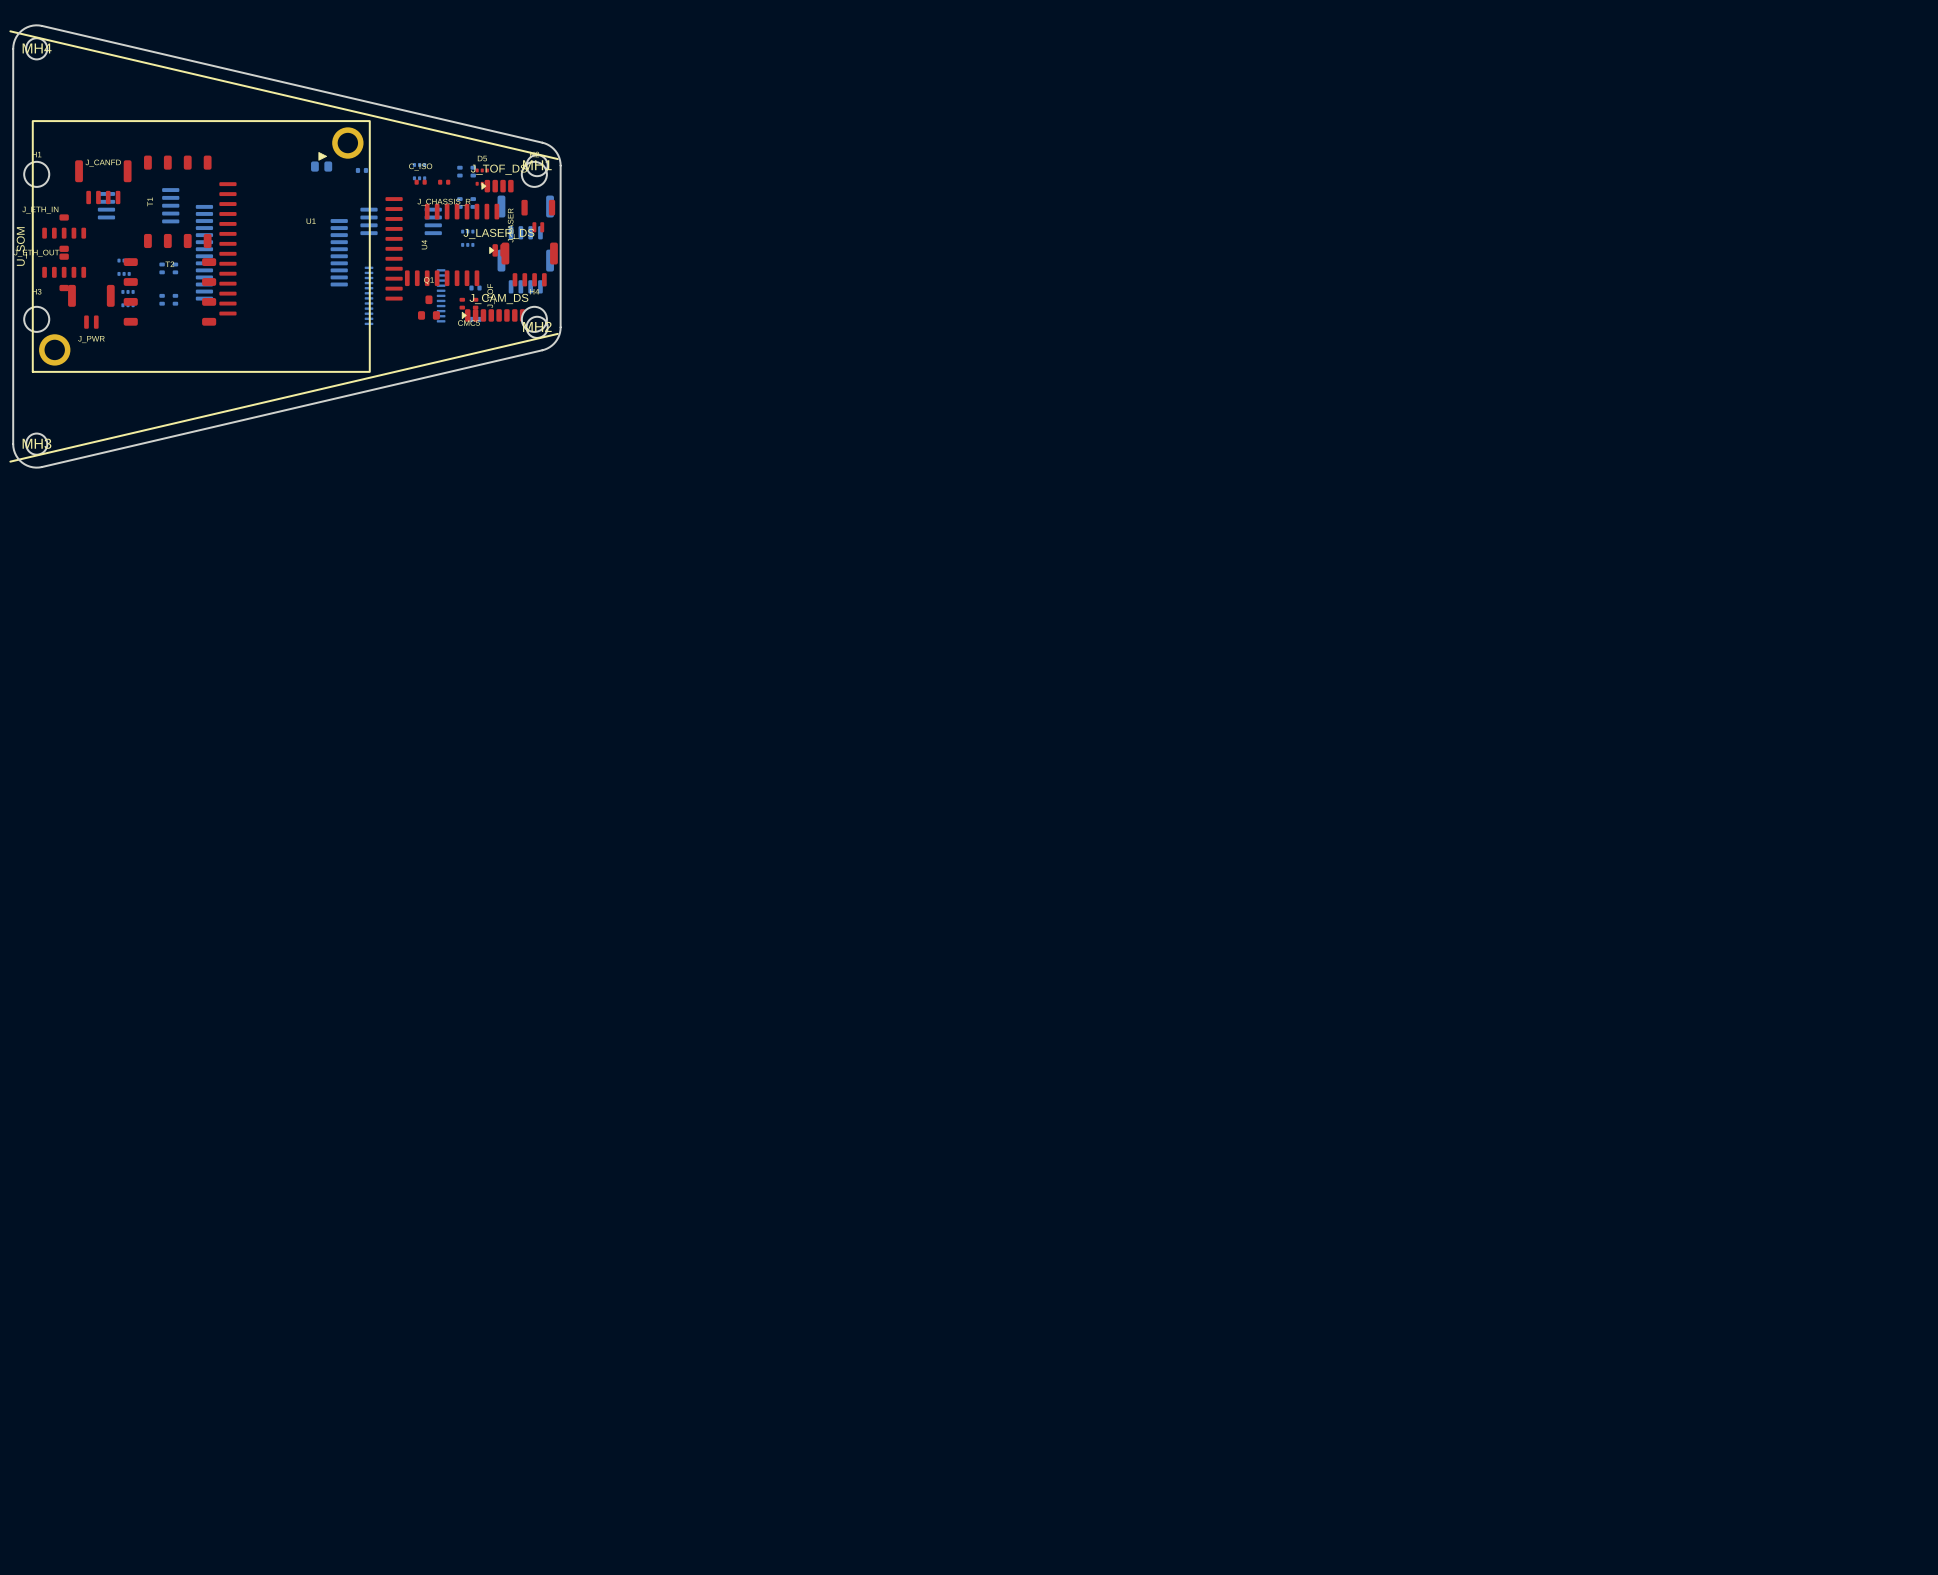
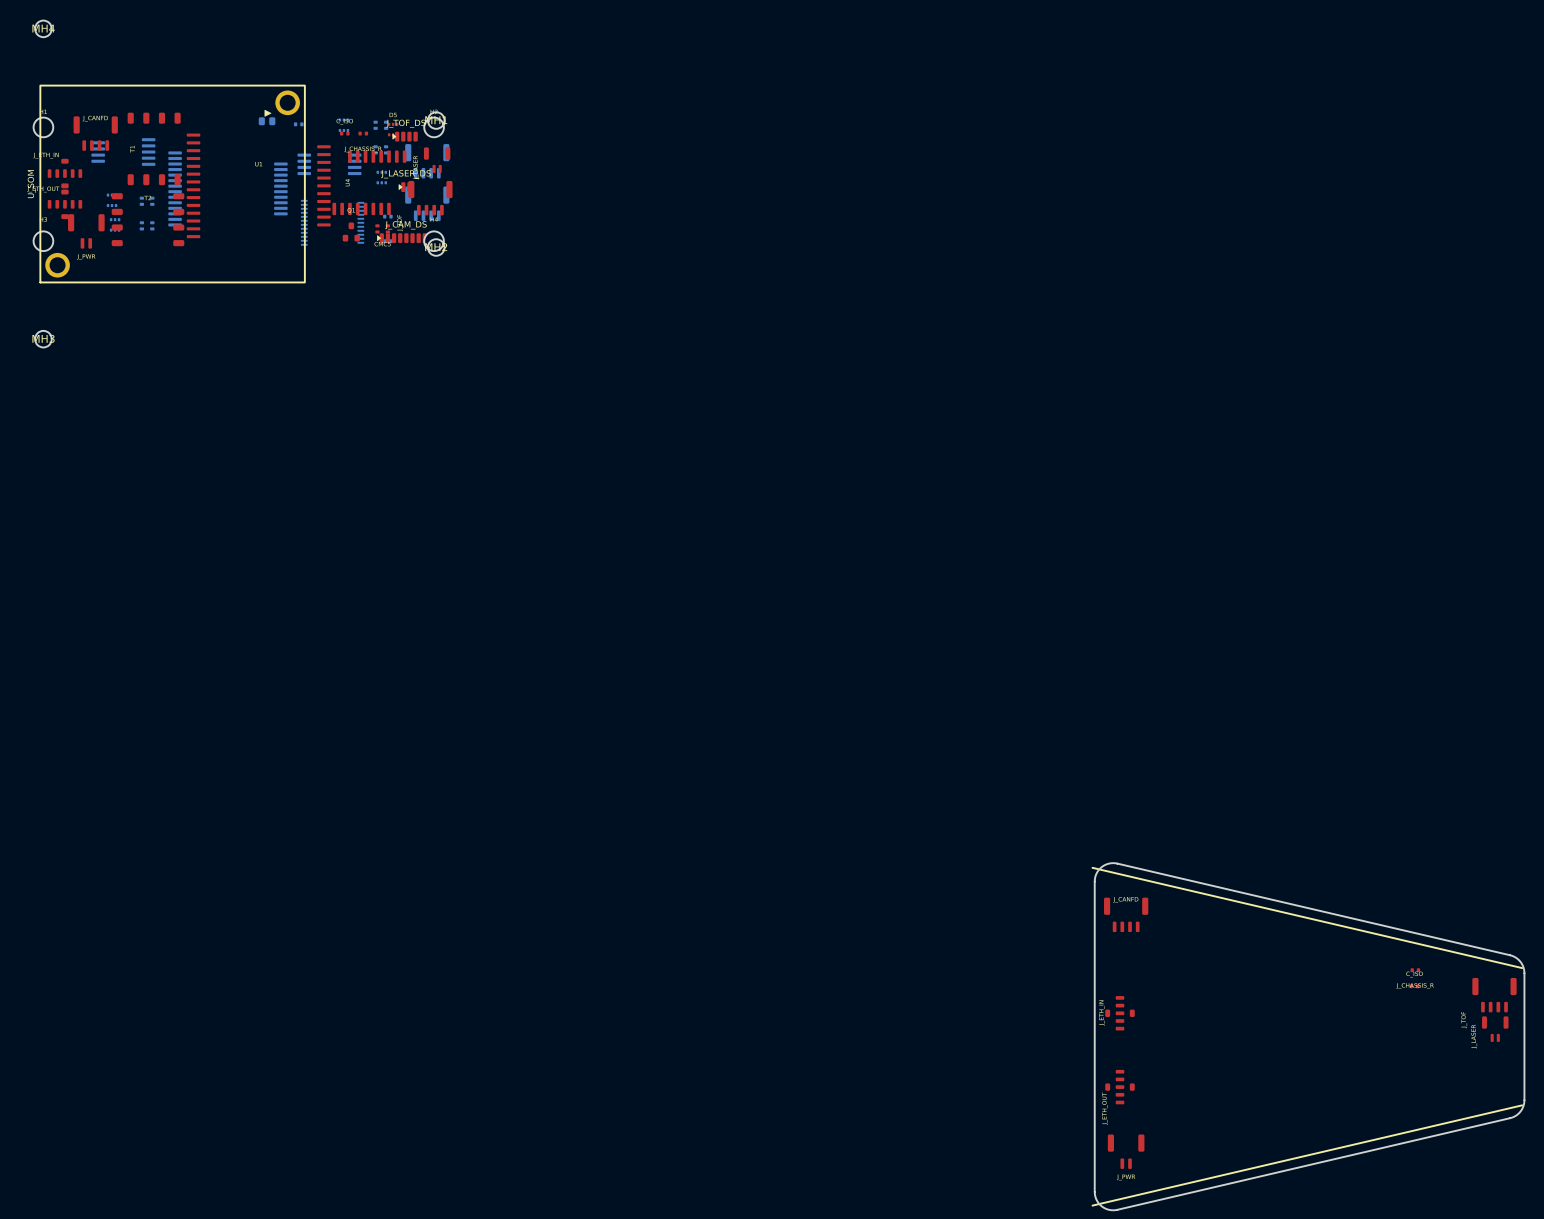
board edge: (42, 25) (549, 145) (558, 155) (560, 165) (560, 327) (557, 339) (551, 345) (542, 350) (42, 467) (33, 467) (24, 464) (16, 455) (13, 444) (13, 48) (14, 39) (22, 30) (33, 25) (42, 25) -> none
line: (10, 31) (557, 159) -> none
line: (557, 333) (10, 461) -> none
board edge: none -> (1117, 863) (1515, 957) (1521, 963) (1524, 973) (1524, 1100) (1521, 1109) (1510, 1118) (1117, 1209) (1103, 1207) (1097, 1200) (1094, 1191) (1094, 881) (1097, 872) (1101, 867) (1108, 863) (1117, 863)
line: none -> (1092, 867) (1522, 968)
part: none -> (1126, 914)
part: none -> (1415, 970)
part: none -> (1414, 986)
part: none -> (1494, 995)
part: none -> (1120, 1013)
part: none -> (1495, 1029)
part: none -> (1120, 1087)
line: none -> (1522, 1105) (1092, 1205)
part: none -> (1126, 1151)

